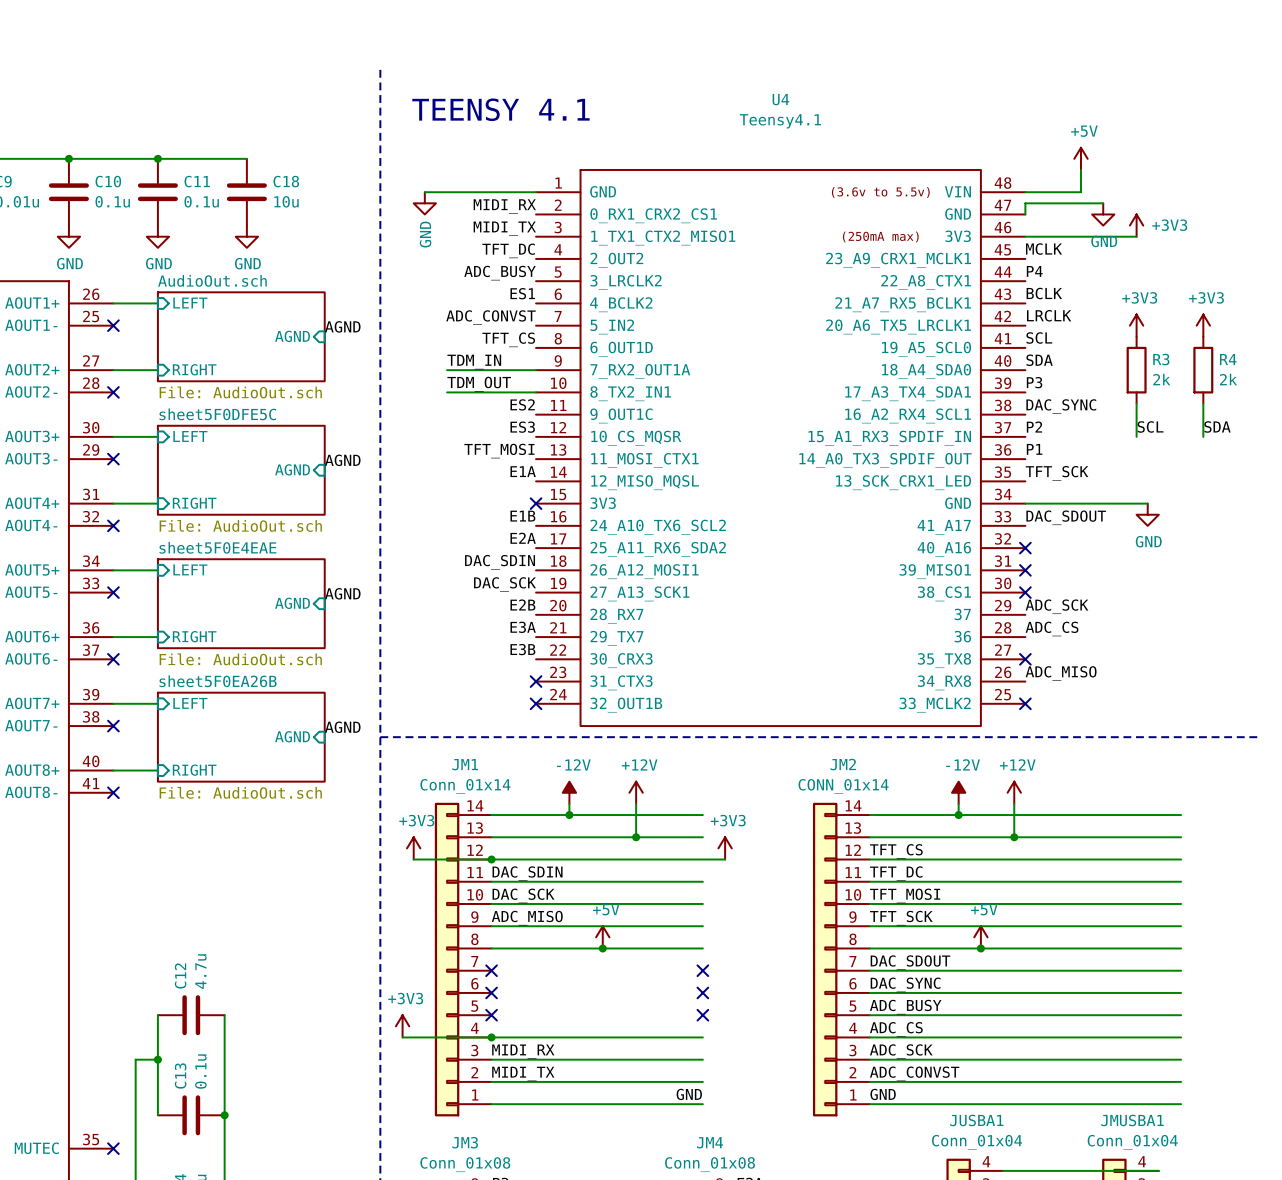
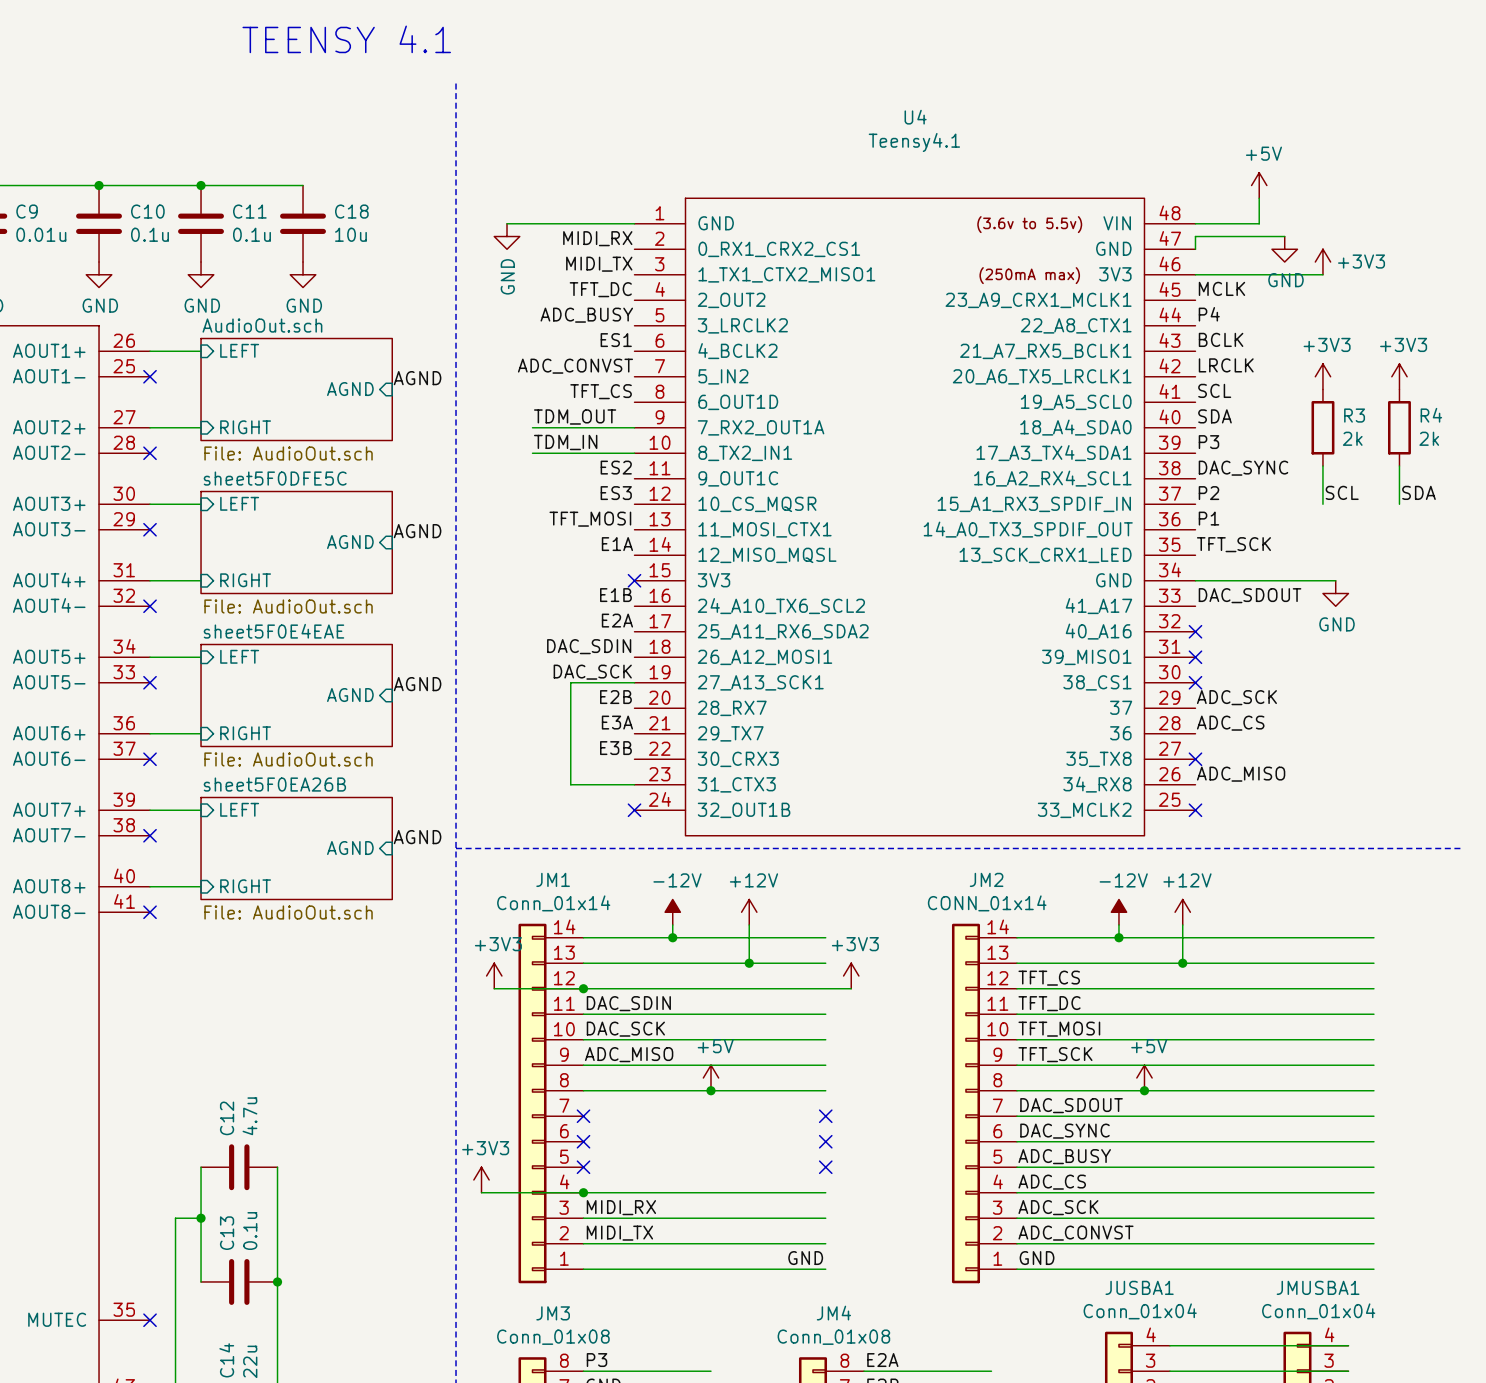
text: none -> TEENSY 4.1 (346, 39)
text: TEENSY 4.1 (500, 109) -> none
label: TDM_IN (474, 362) -> TDM_OUT (575, 416)
label: TDM_OUT (479, 384) -> TDM_IN (565, 442)
wire: none -> (634, 682) (570, 682) (570, 784) (634, 784)
no-connect mark: (536, 681) -> none

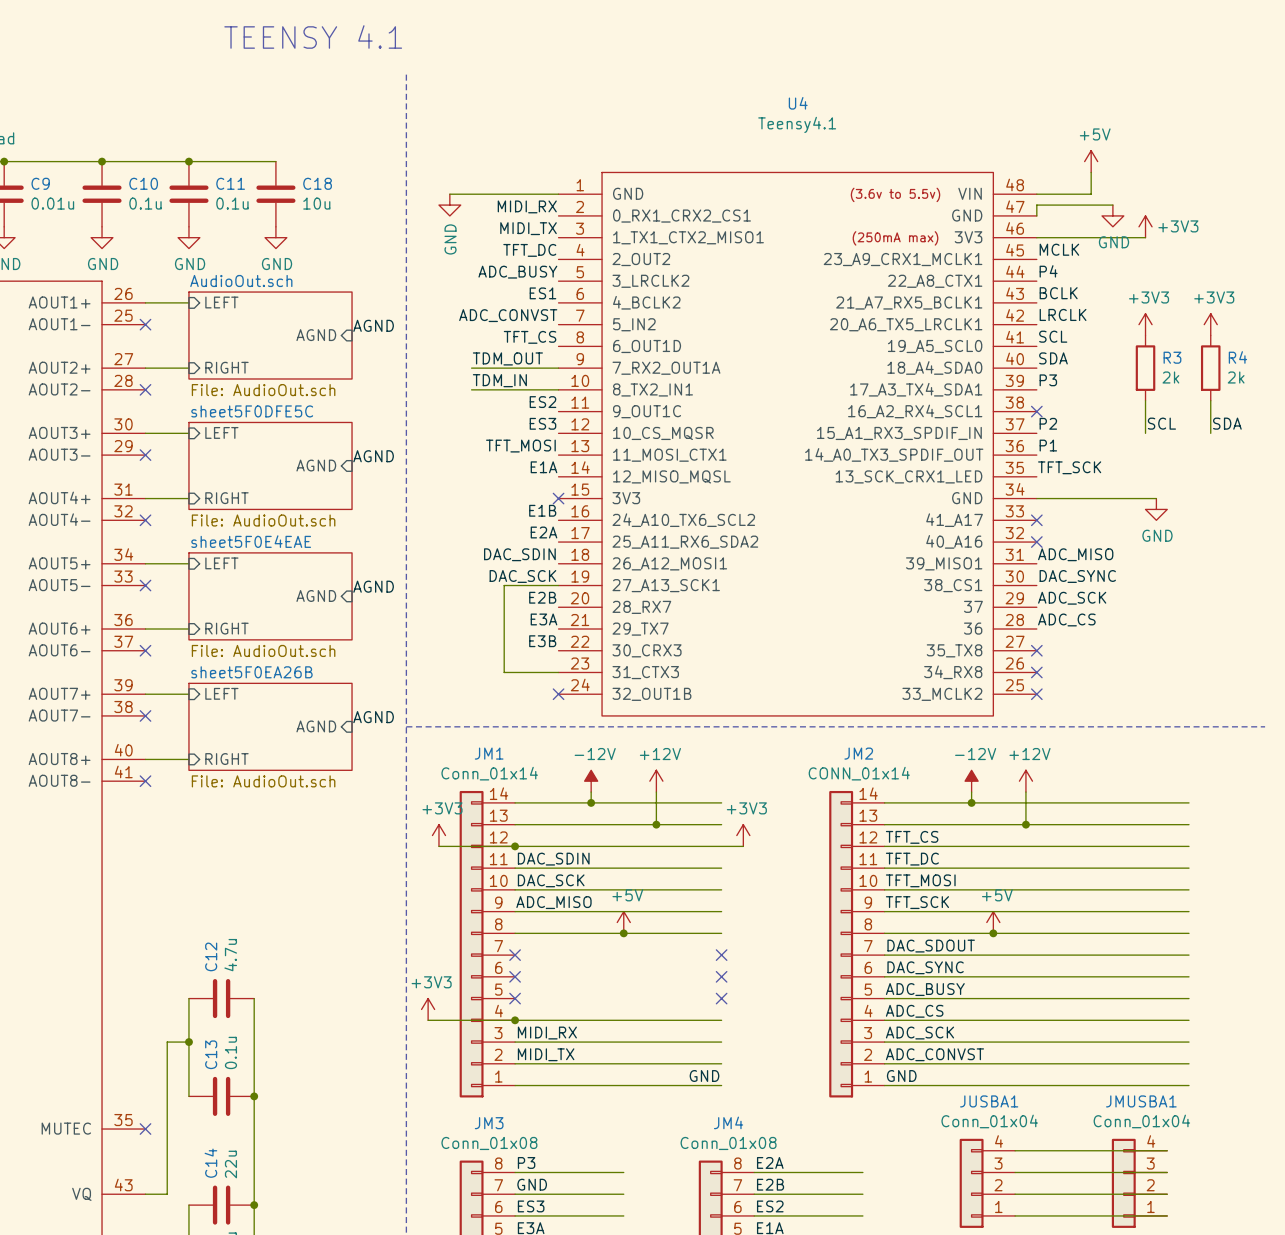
label position: DAC_SYNC (1243, 468) -> DAC_SYNC (1077, 576)
no-connect mark: none -> (1036, 411)
label: DAC_SDOUT (1250, 595) -> none
no-connect mark: none -> (1036, 520)
no-connect mark: (1195, 657) -> none
no-connect mark: (1195, 682) -> none
label position: ADC_MISO (1241, 774) -> ADC_MISO (1075, 554)
no-connect mark: none -> (1036, 672)

